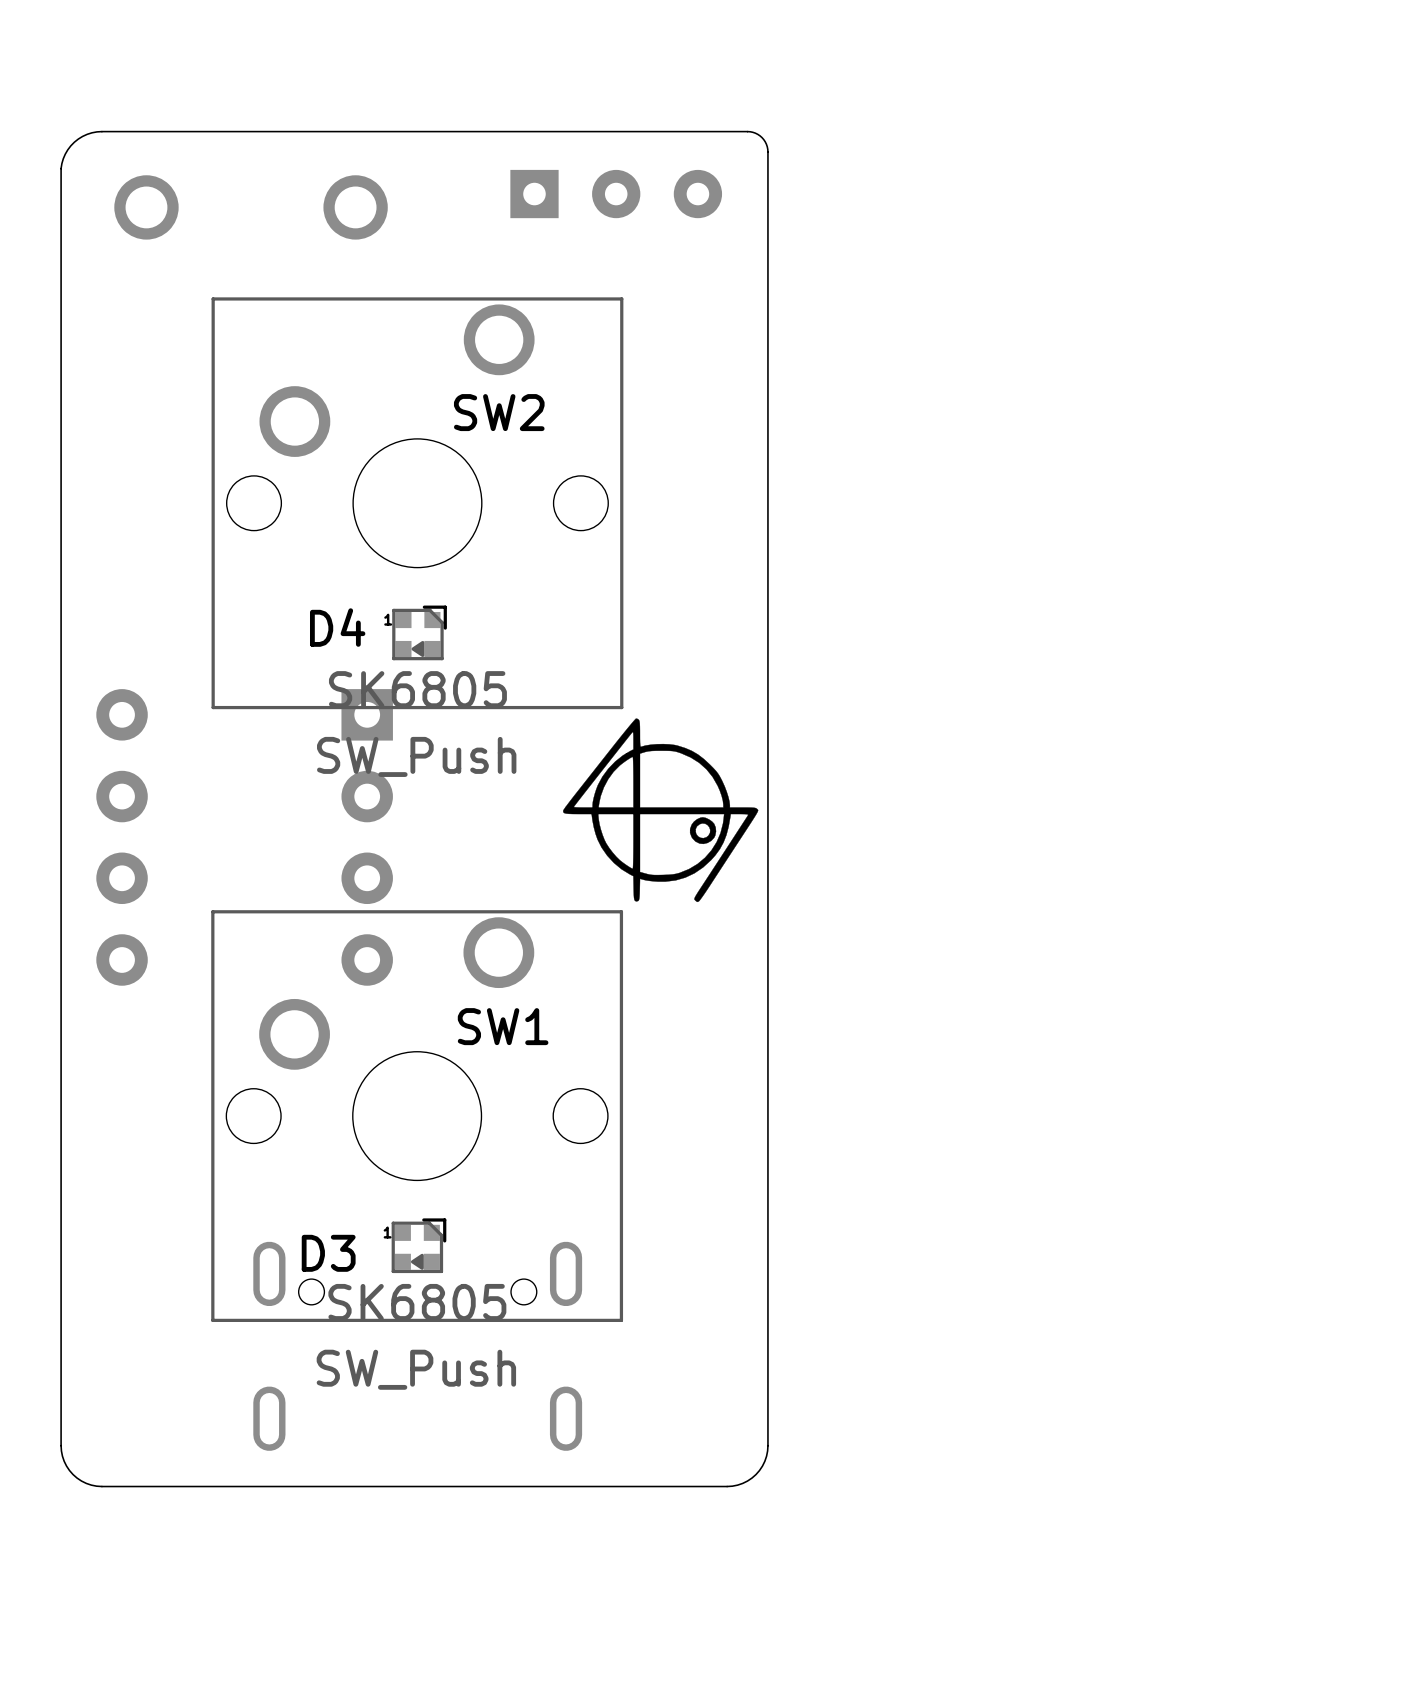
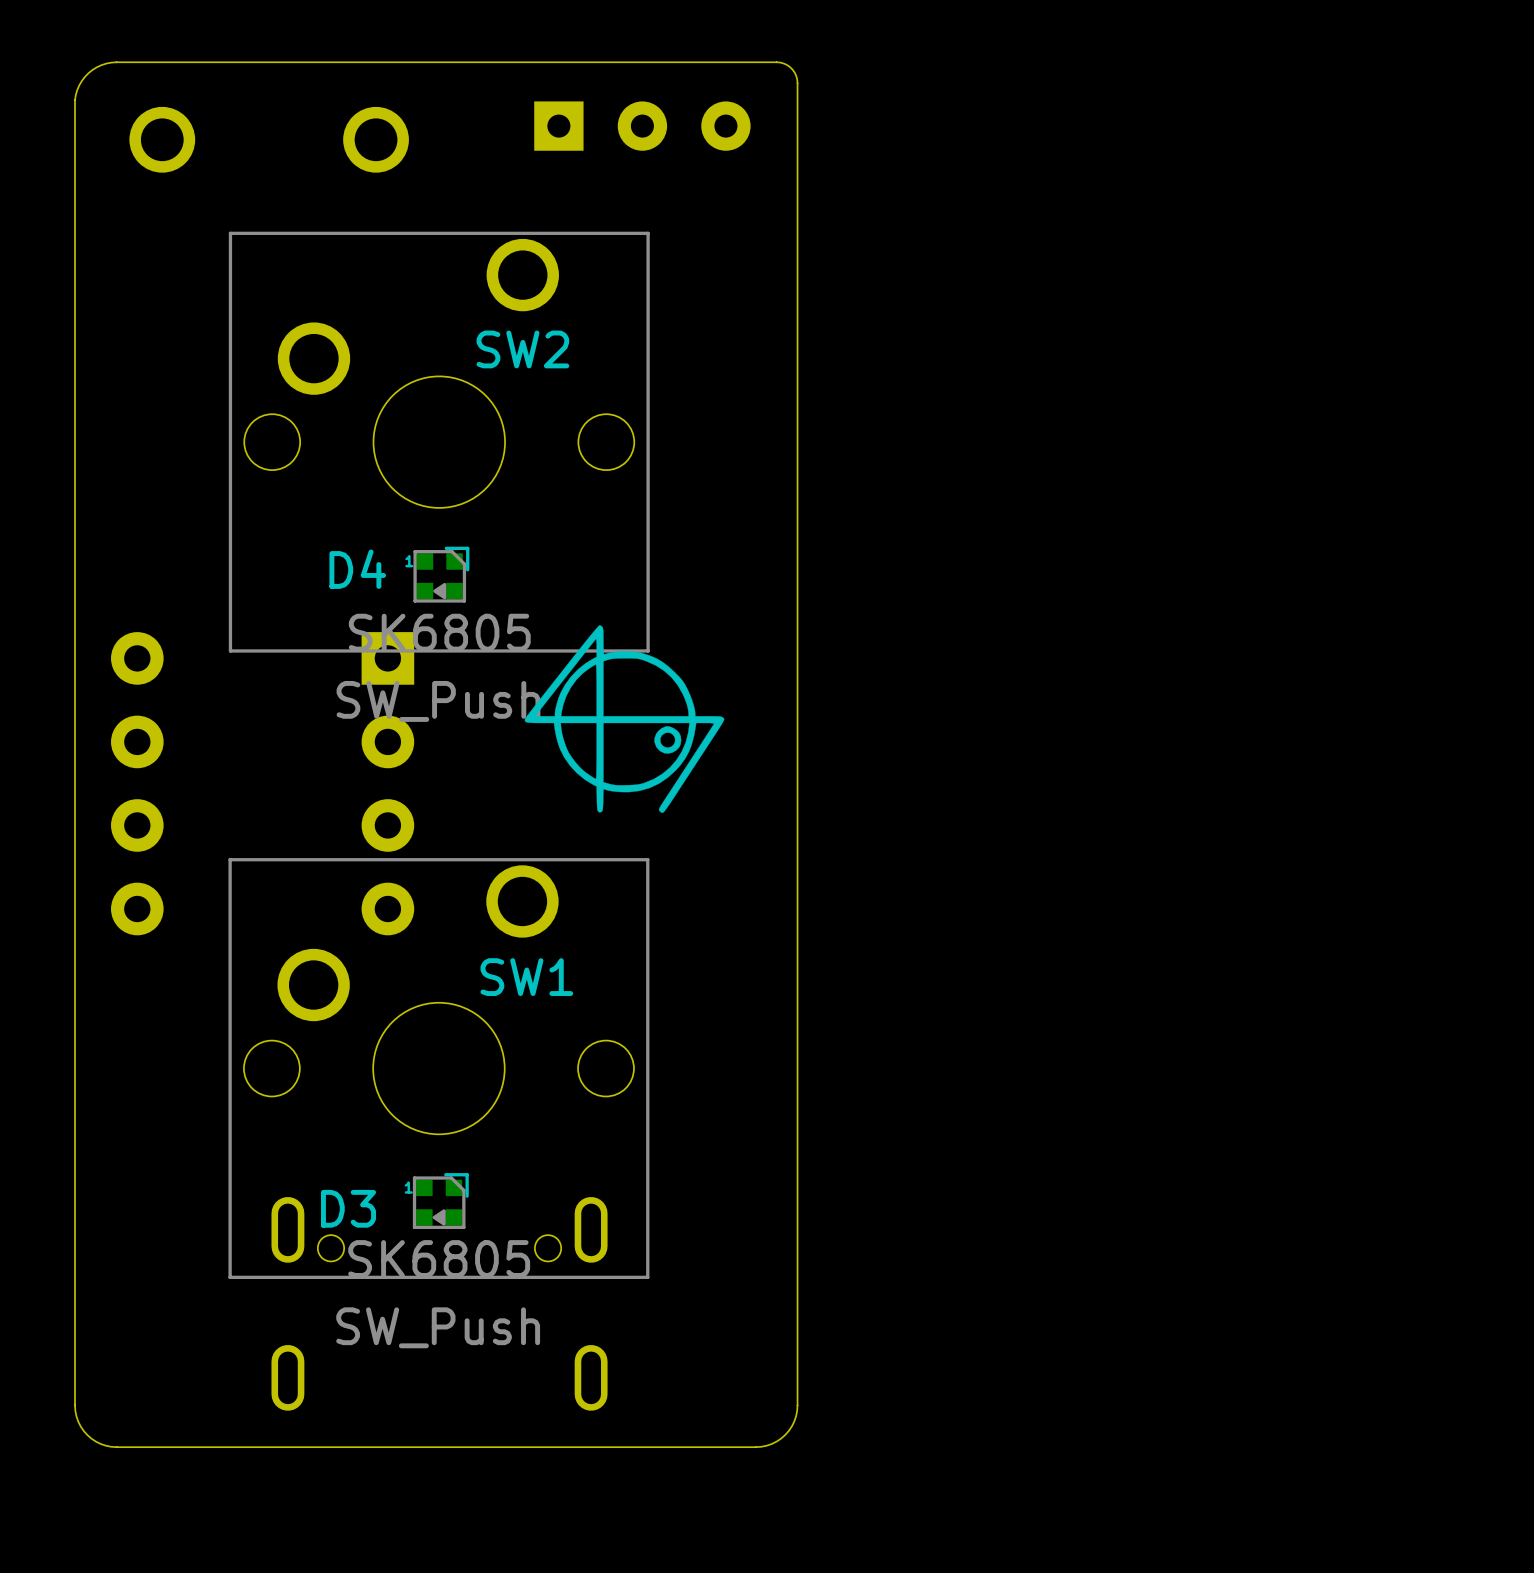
drawing position: (660, 810) -> (624, 719)

